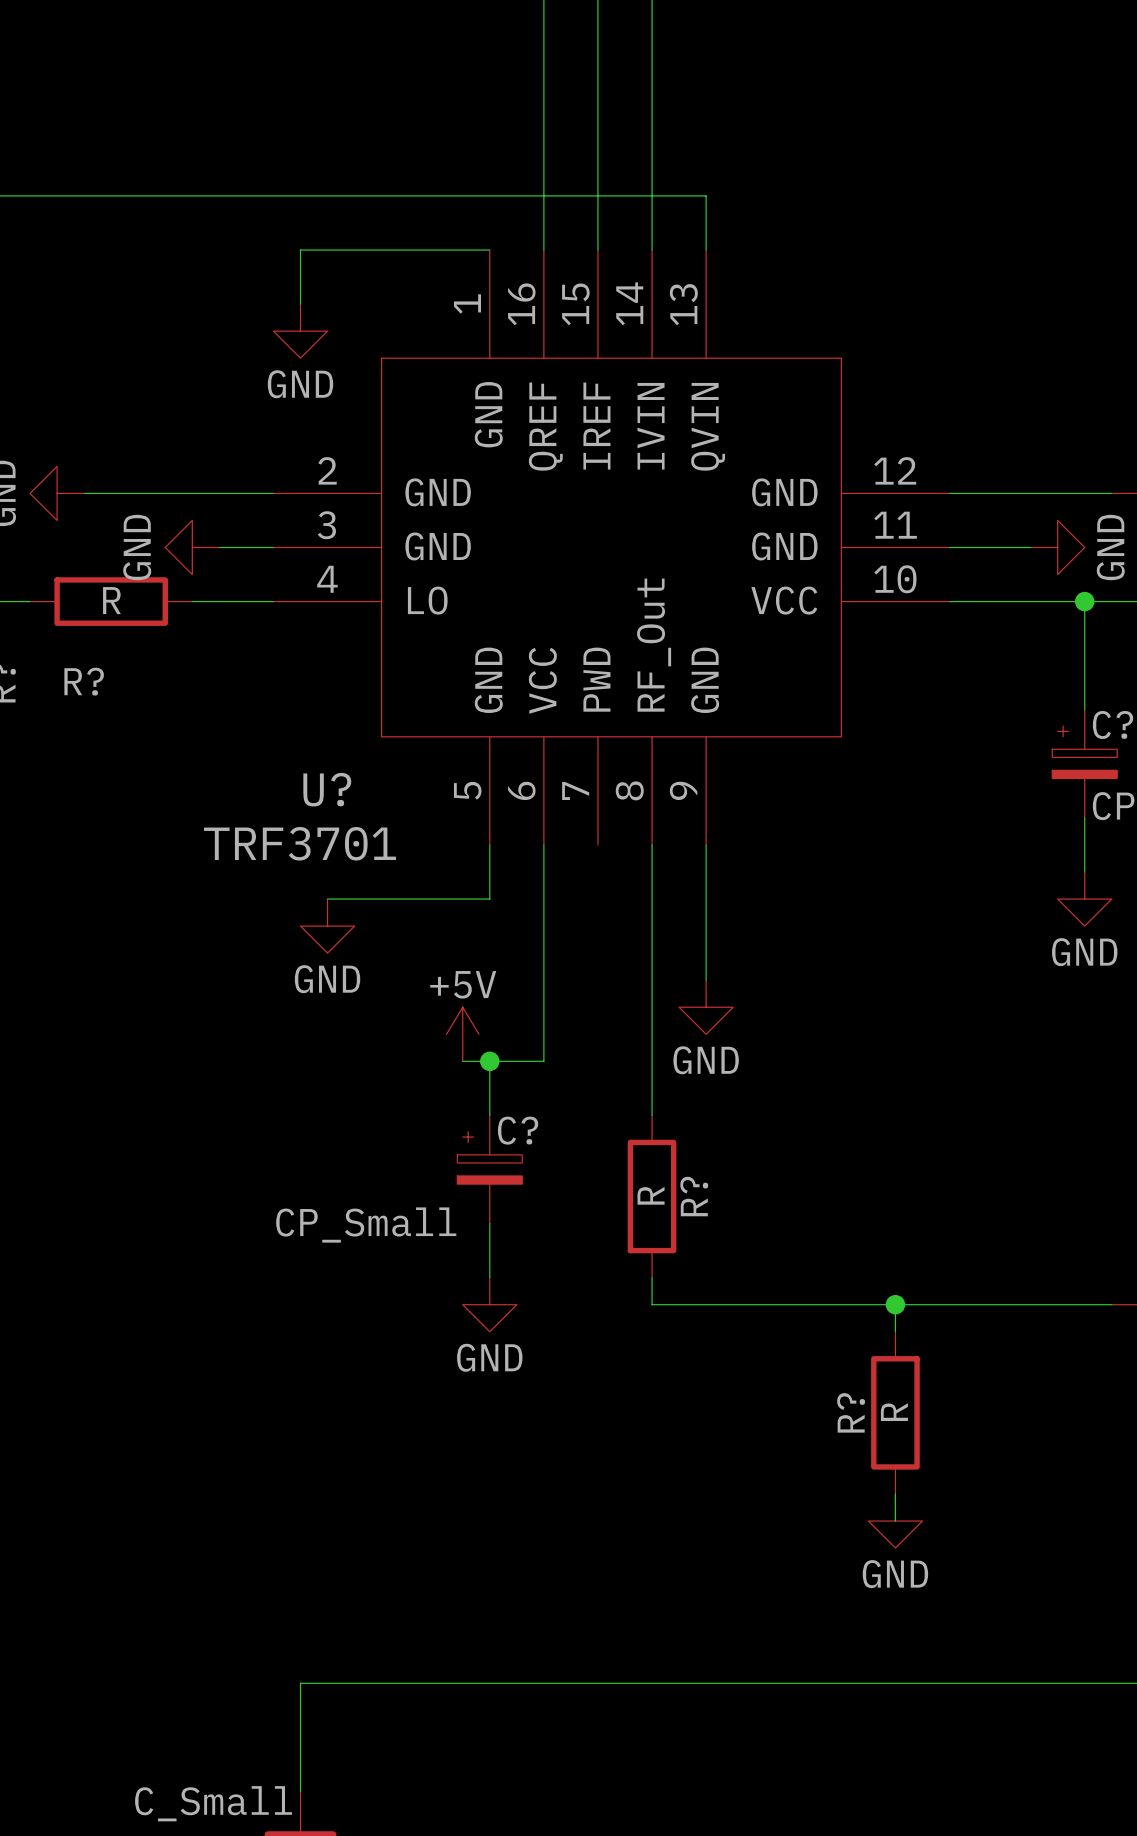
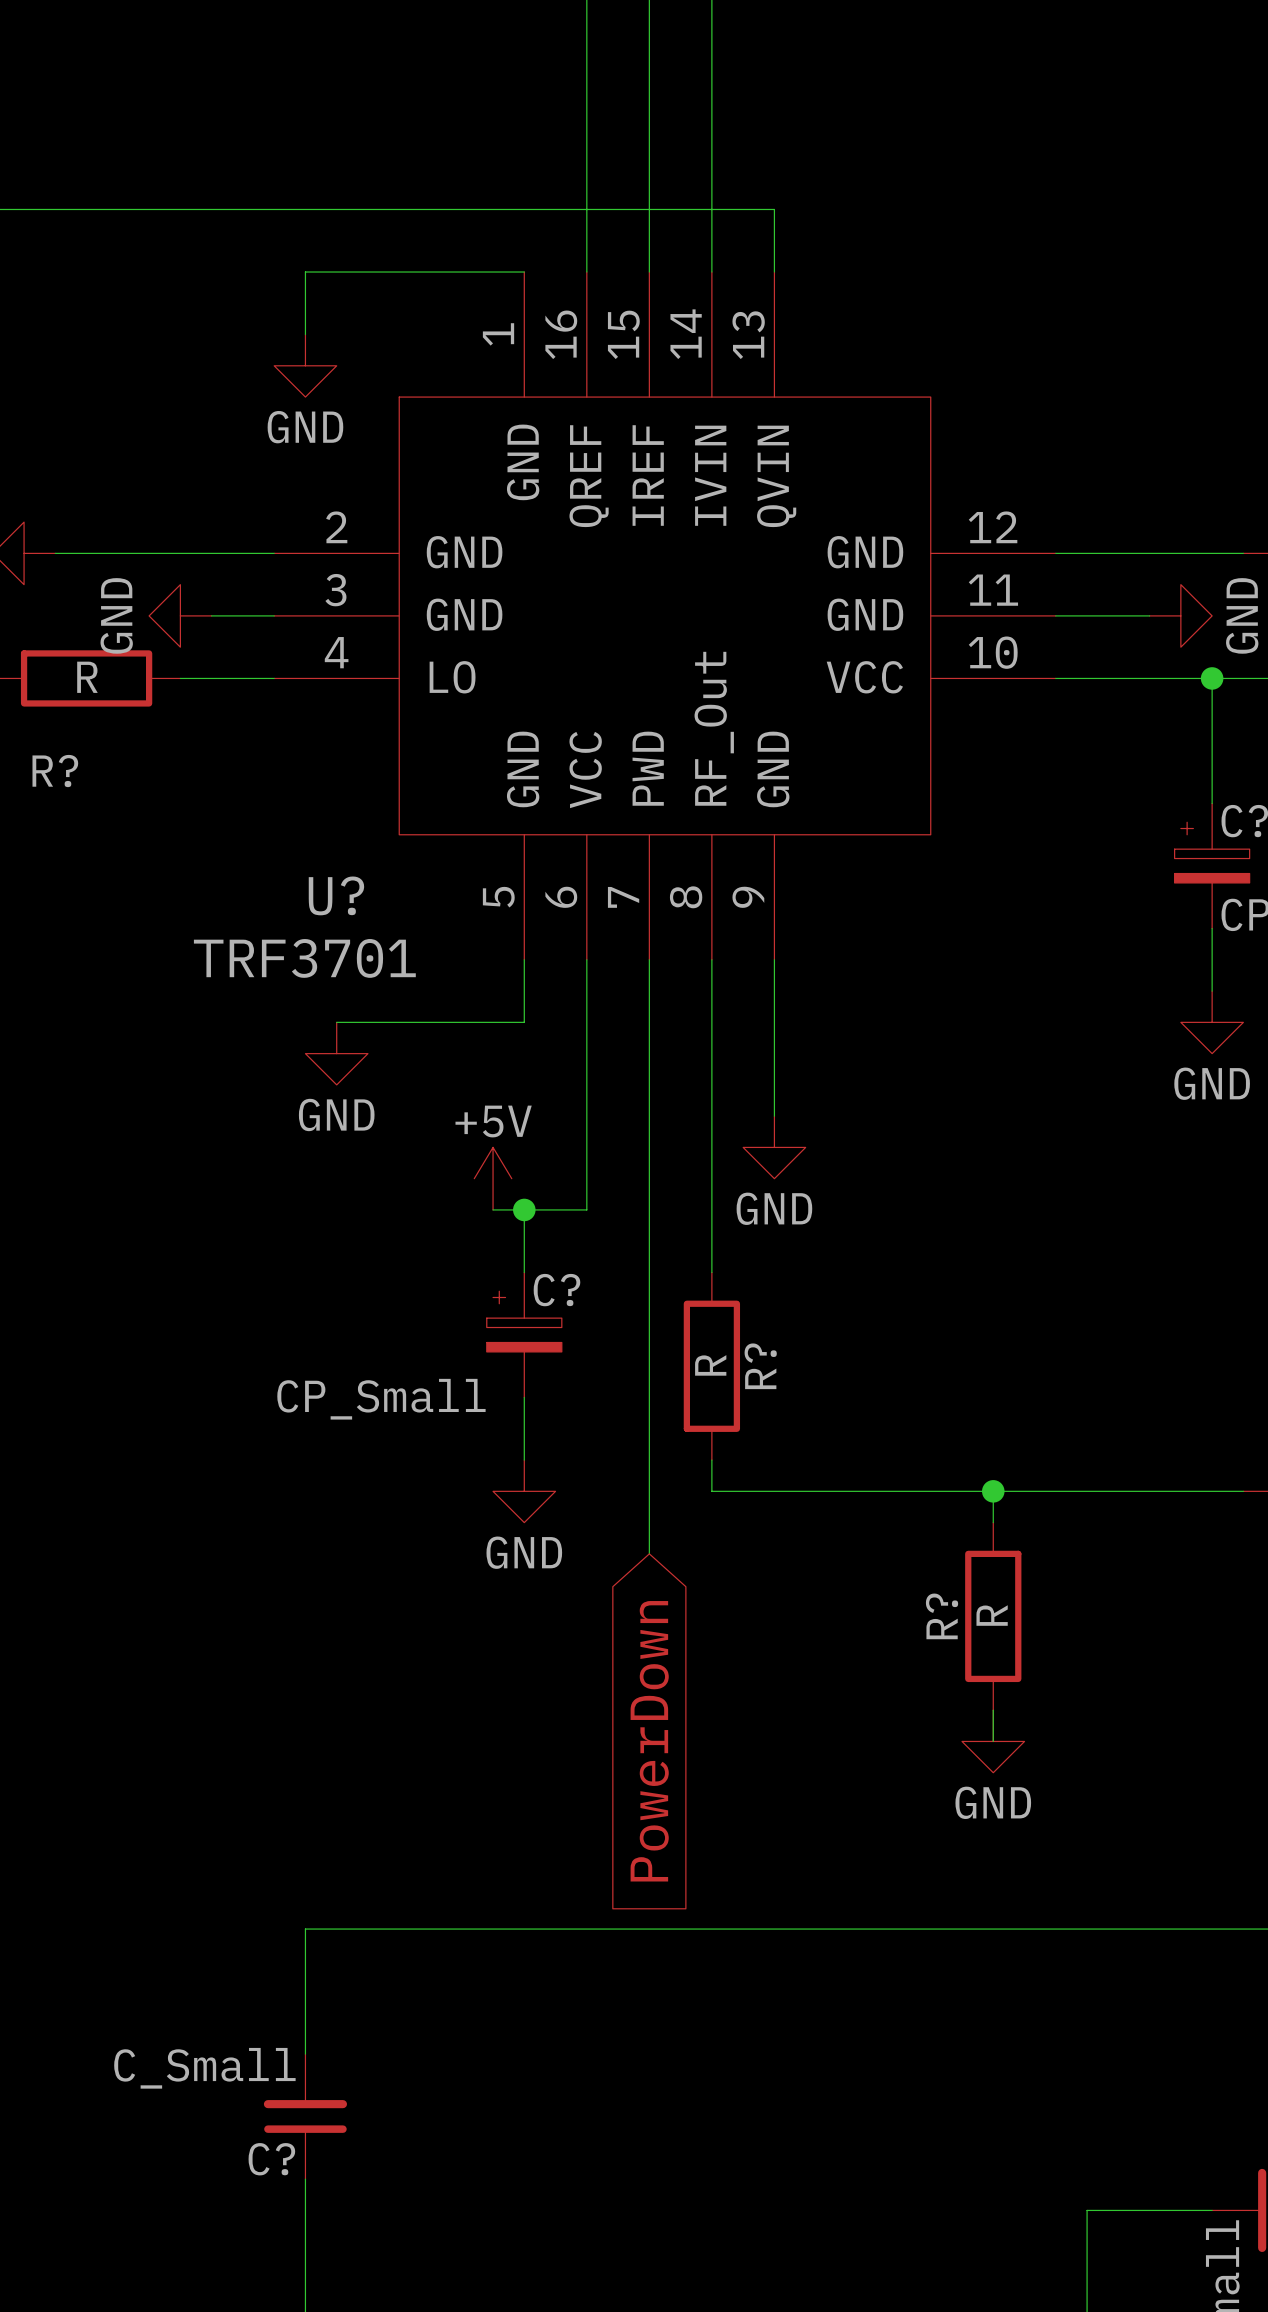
wire: none -> (649, 959) (649, 1553)
global label: none -> PowerDown (649, 1741)

